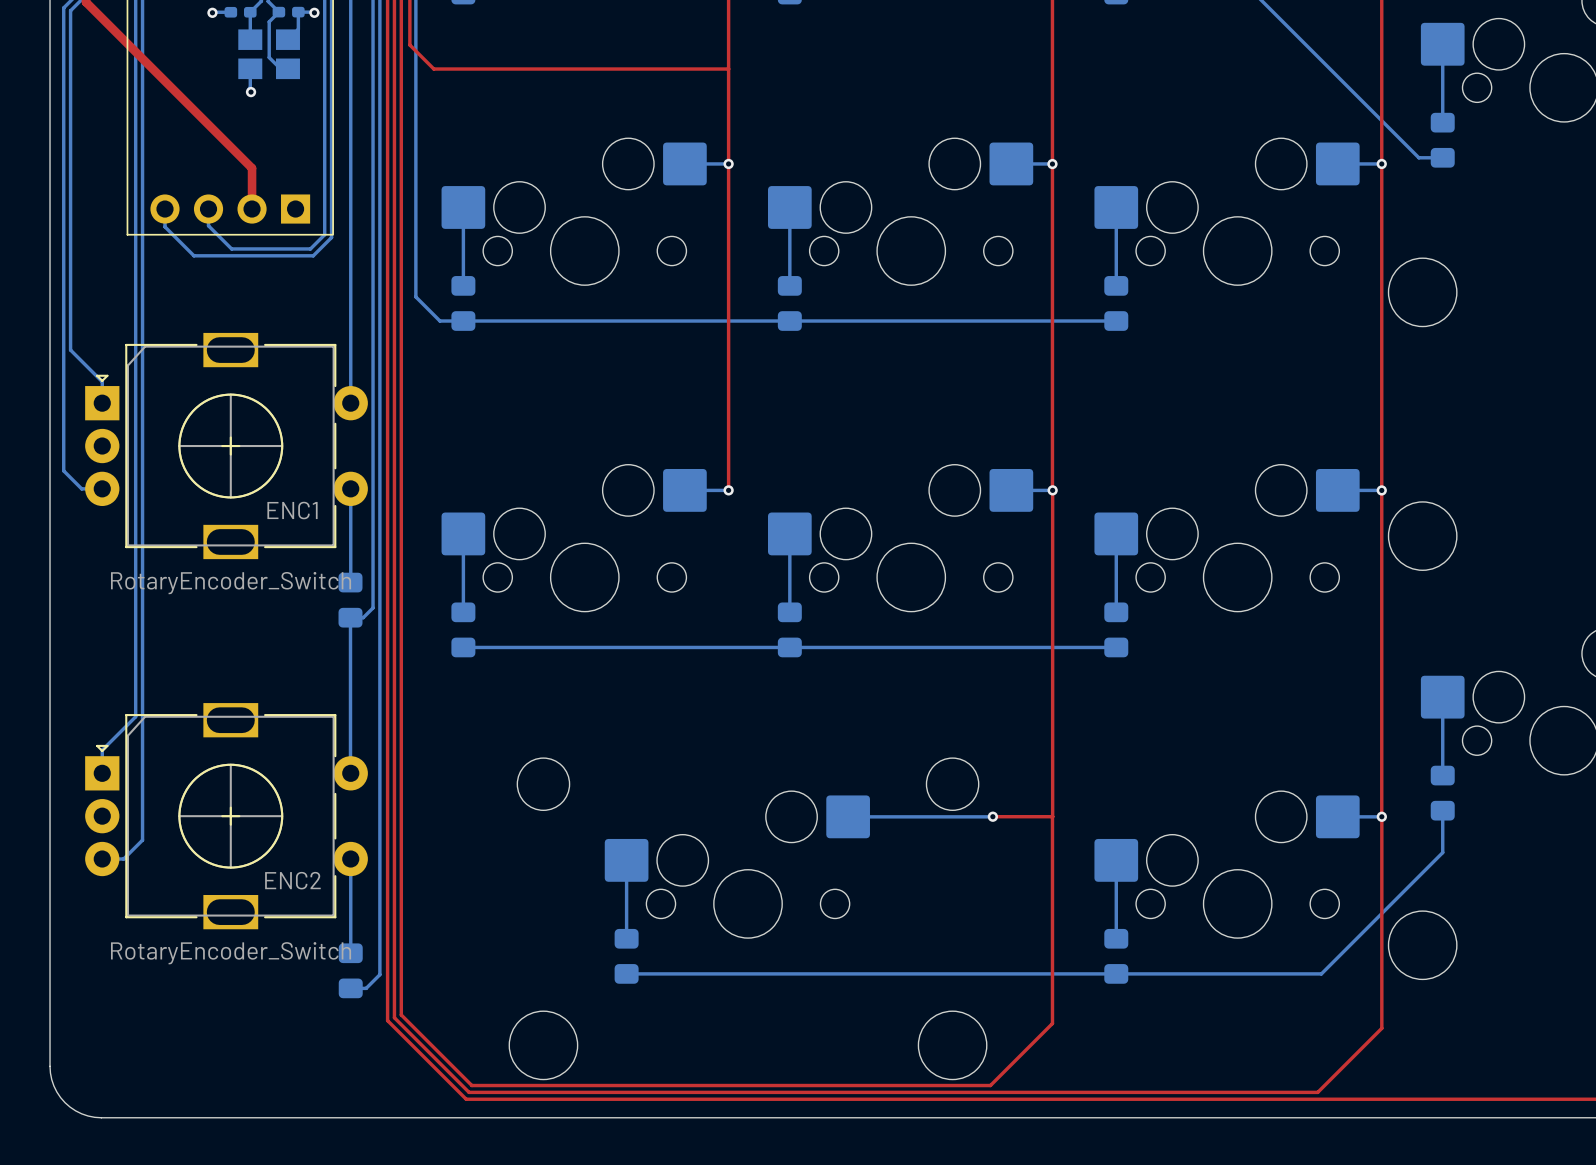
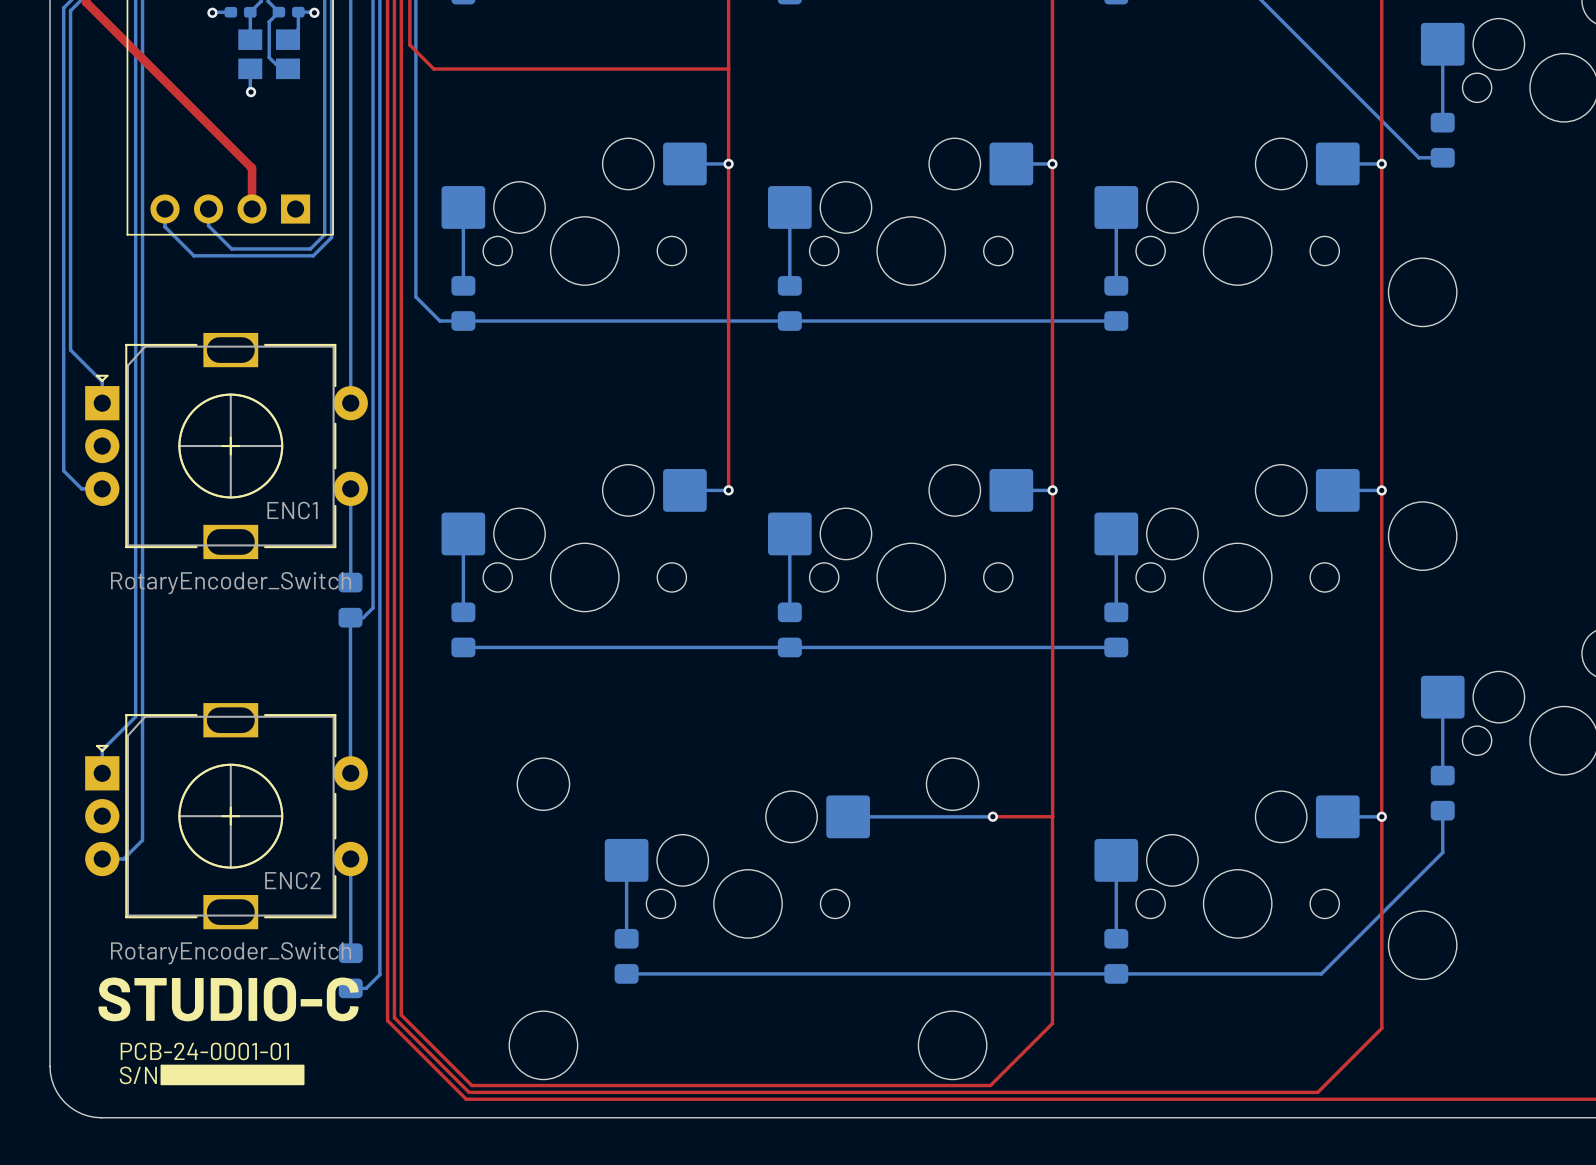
text: none -> STUDIO-C (228, 999)
text: none -> PCB-24-0001-01 (204, 1051)
drawing: none -> [160, 1064, 305, 1086]
text: none -> S/N (138, 1075)

